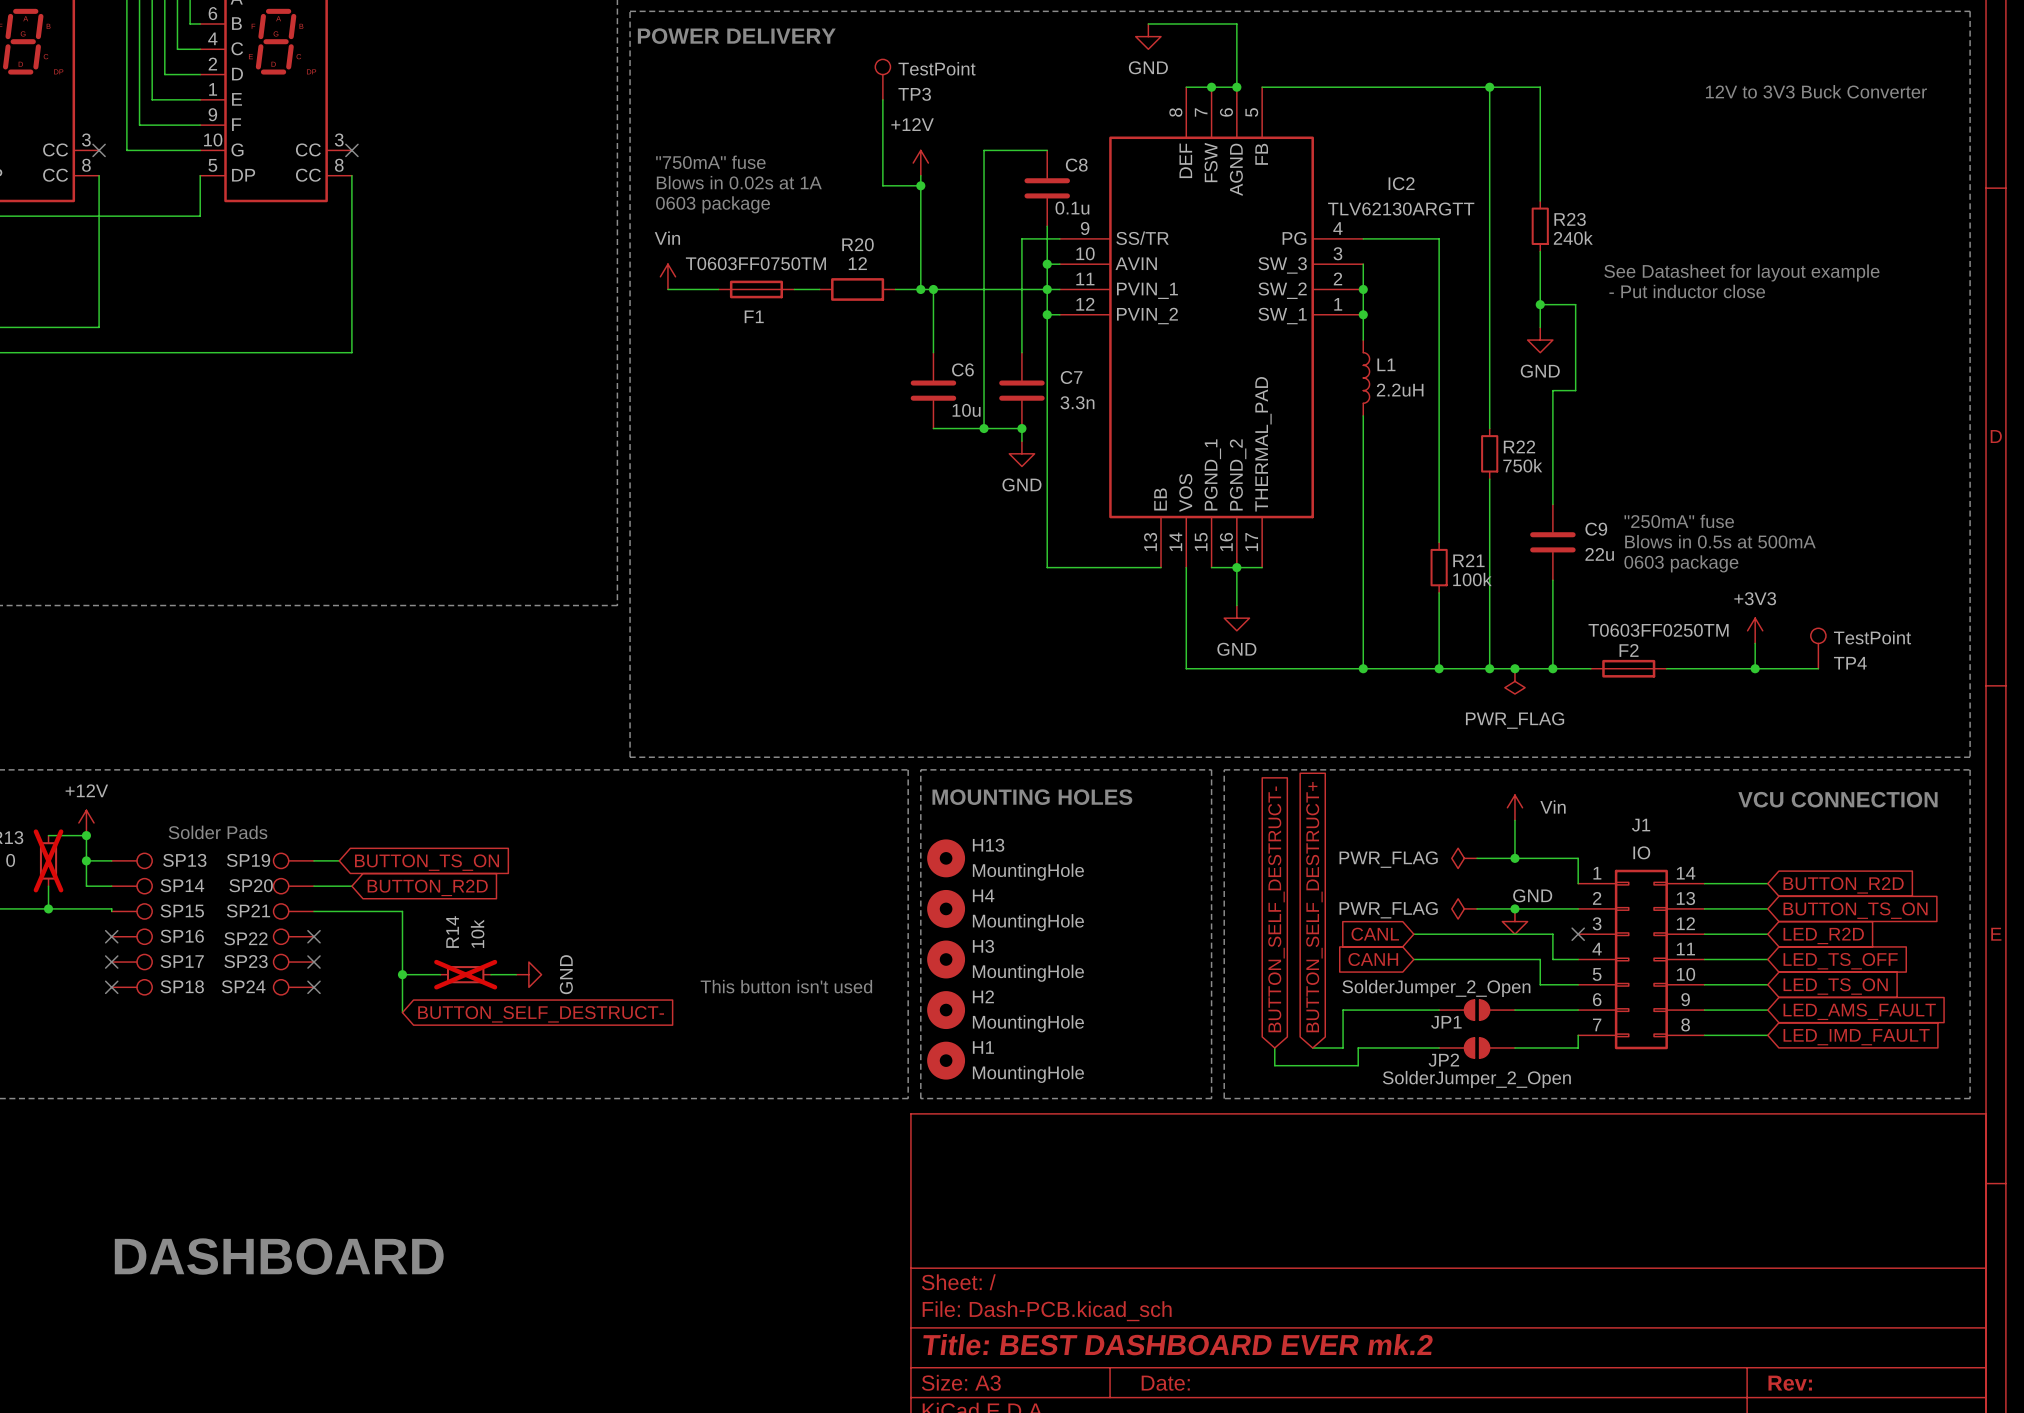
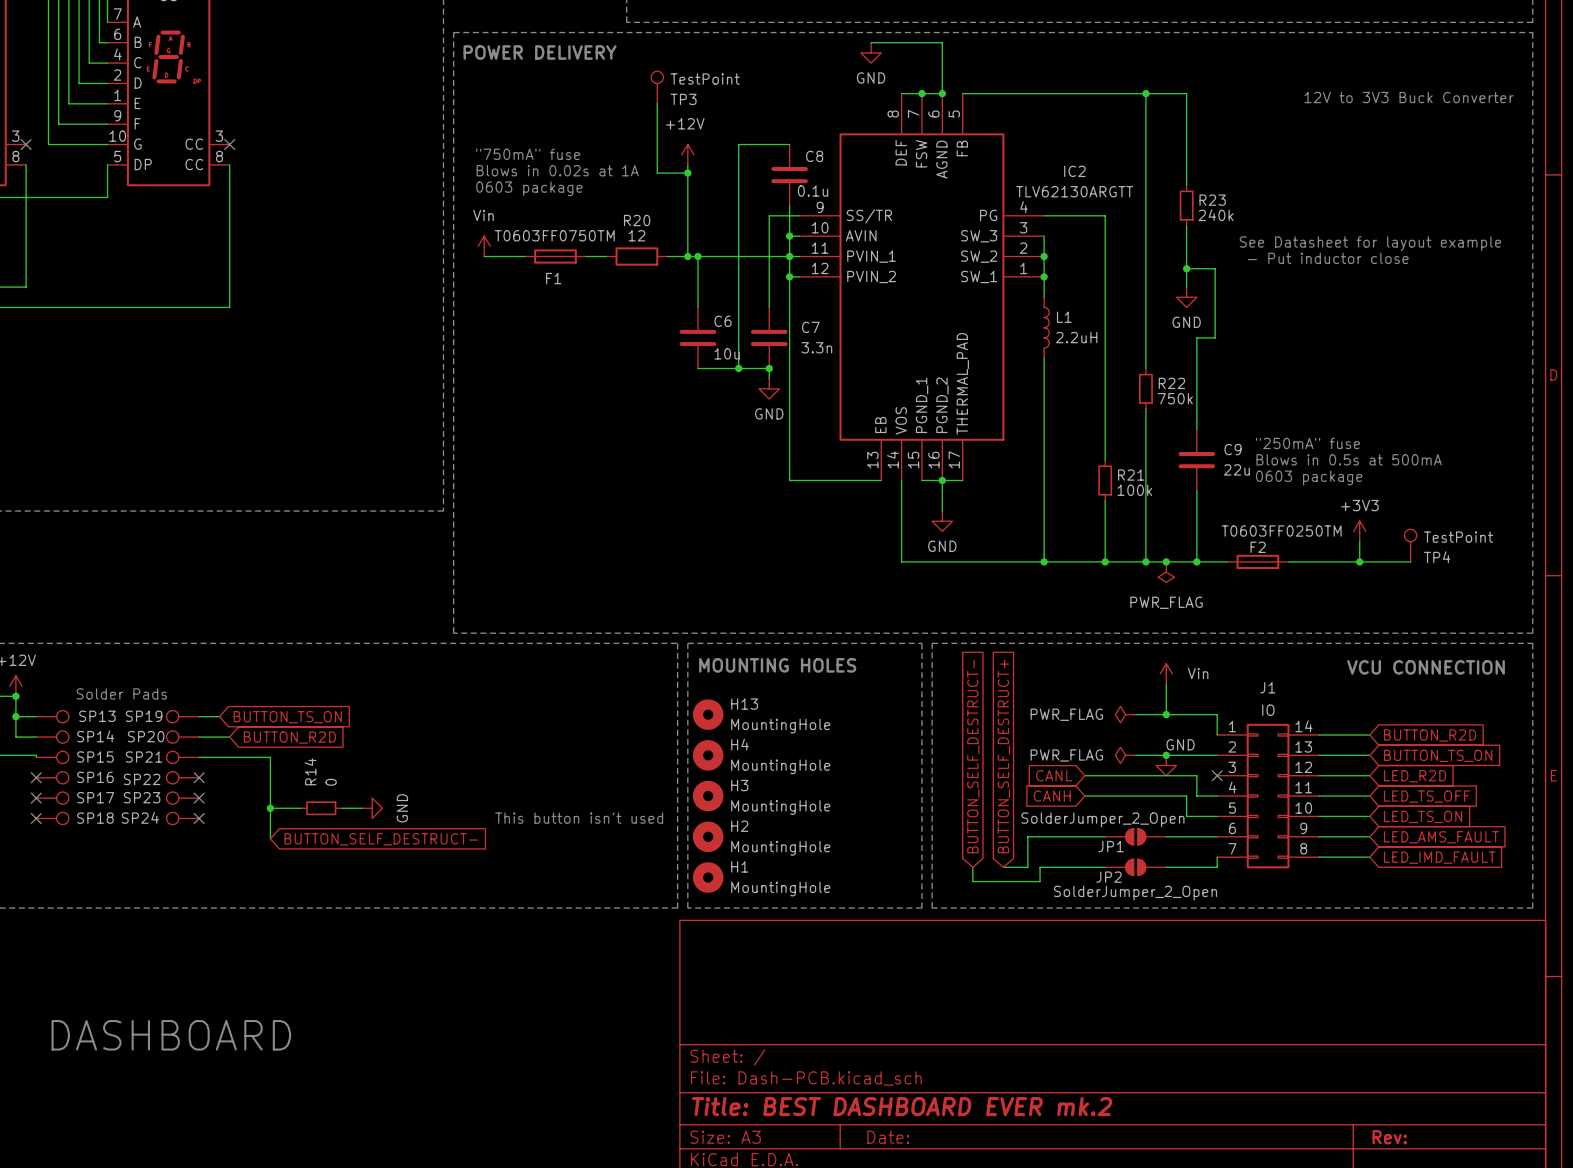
R14 value: 10k (477, 933) -> 0 (331, 782)
R14 do-not-place cross: (465, 974) -> none

